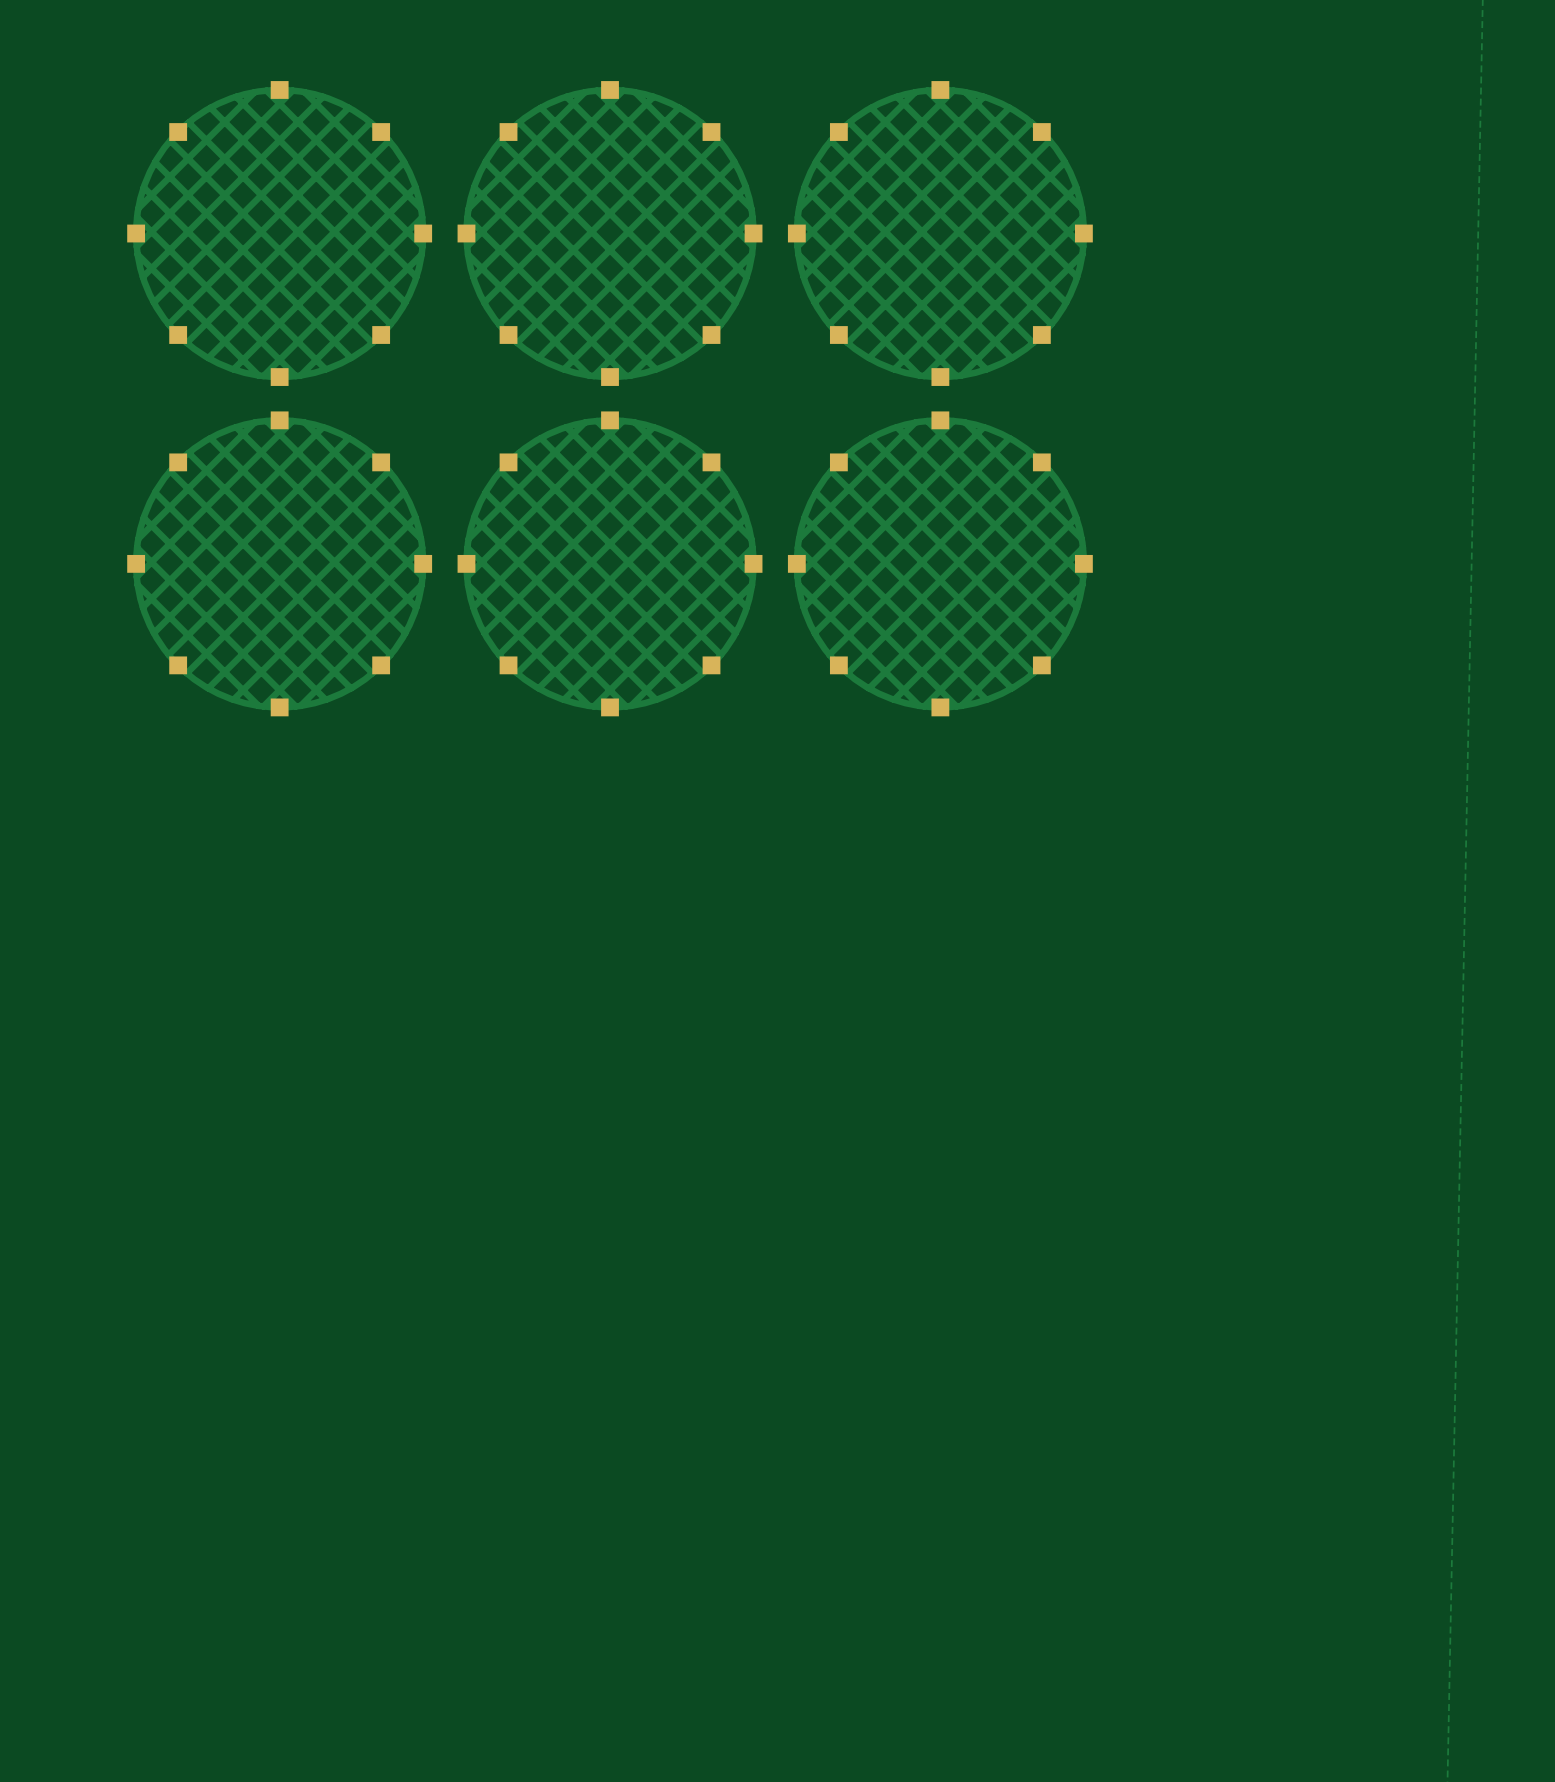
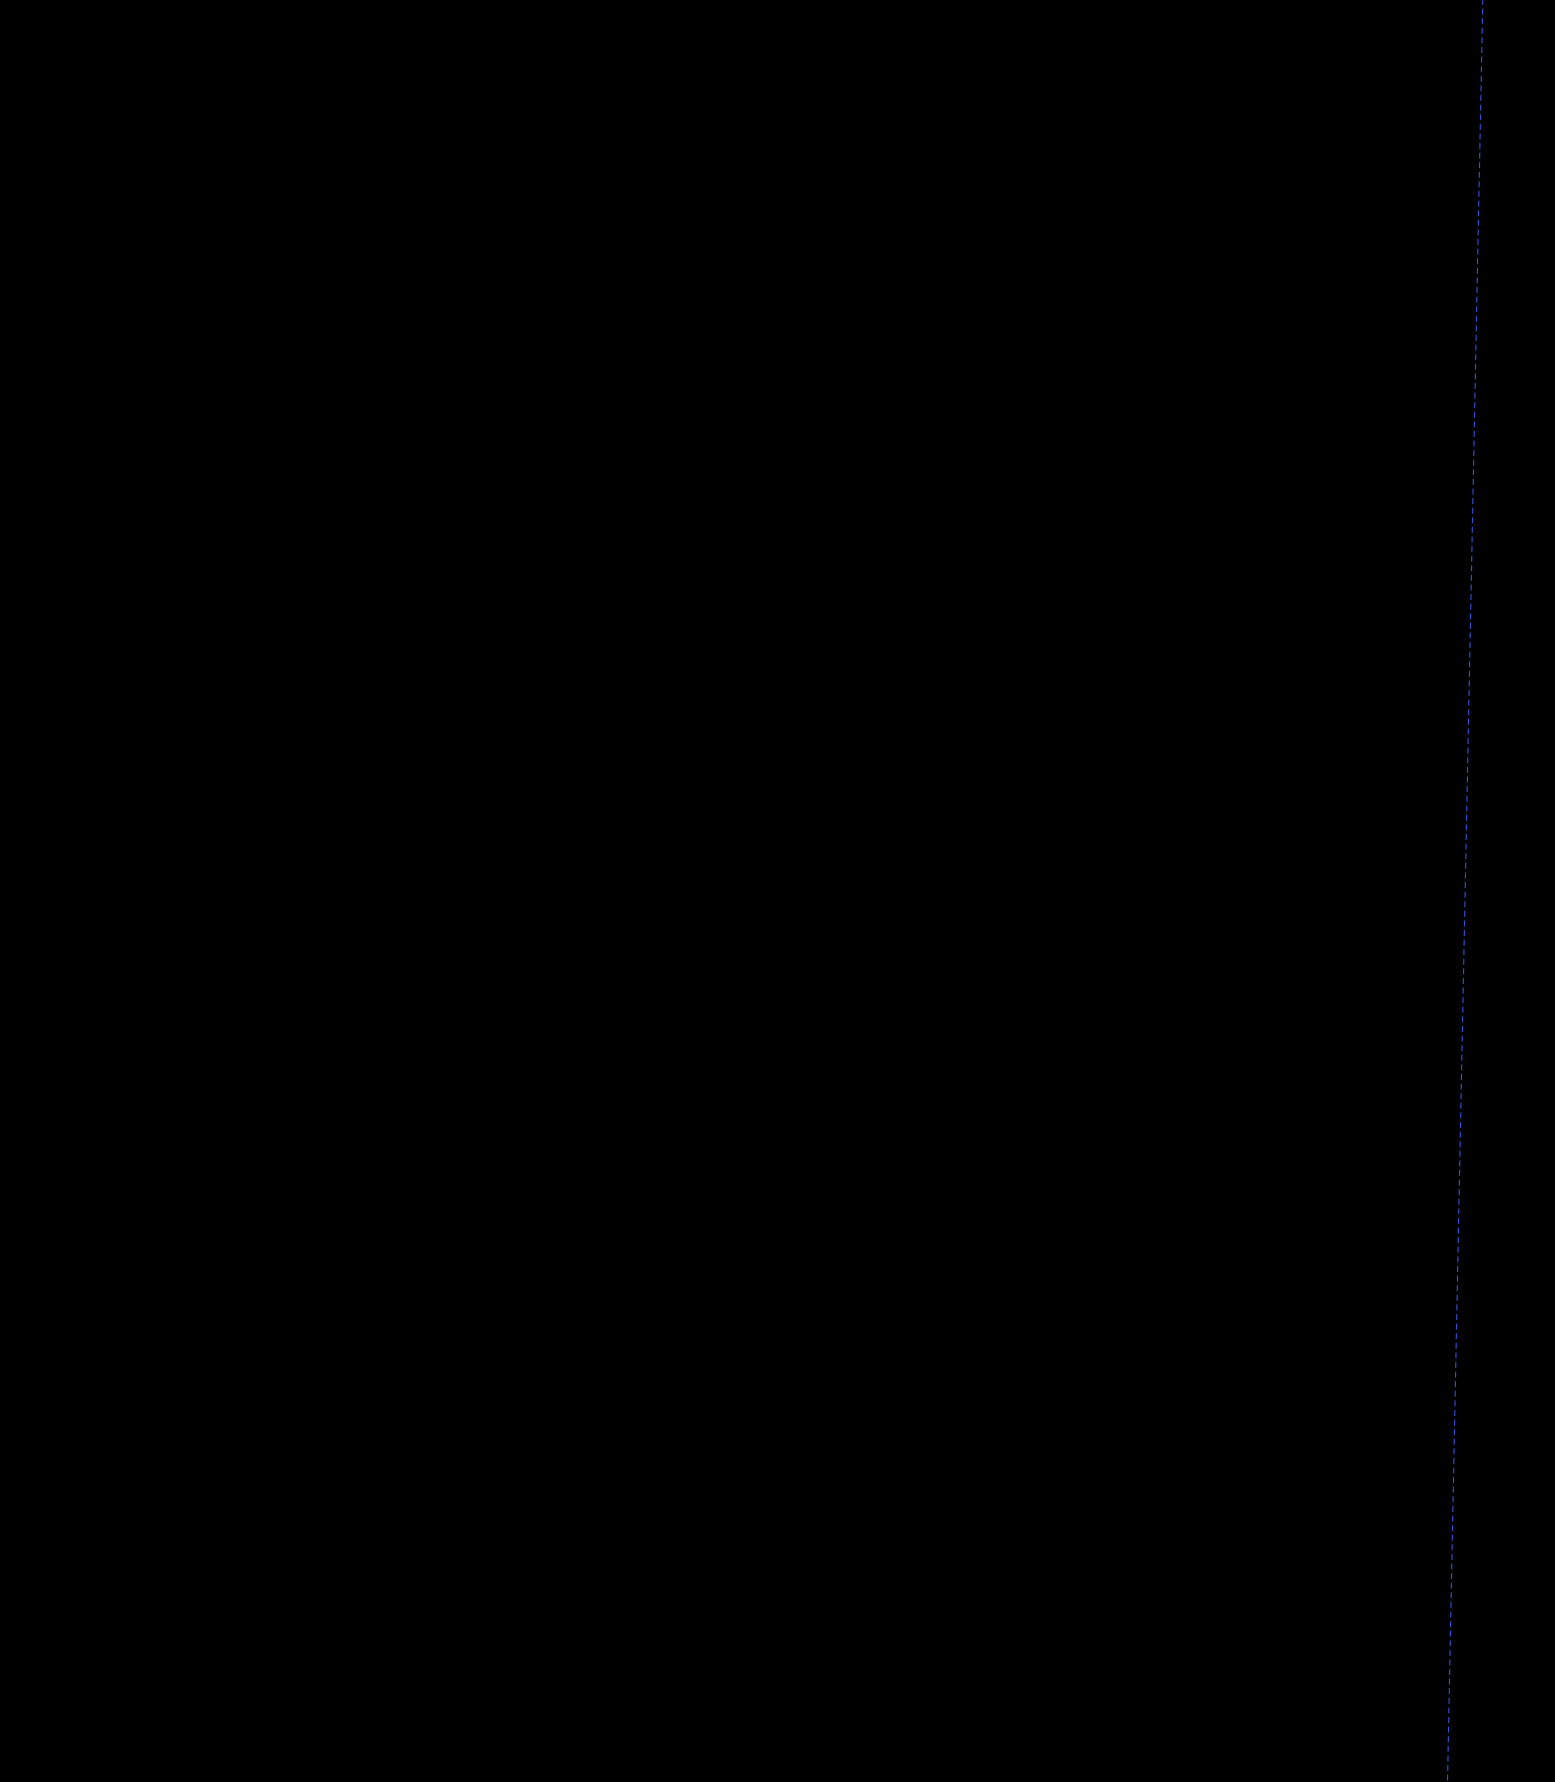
part: (279, 233) -> none
part: (610, 233) -> none
part: (940, 233) -> none
part: (279, 563) -> none
part: (610, 563) -> none
part: (940, 563) -> none

